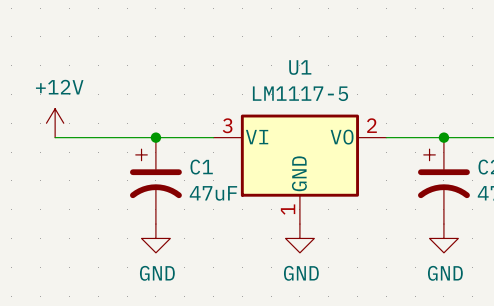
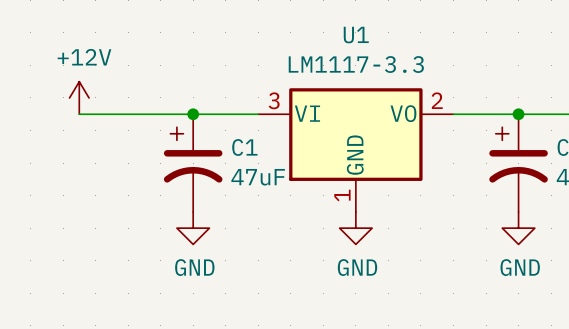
U1 value: LM1117-5 (300, 93) -> LM1117-3.3 (356, 64)

